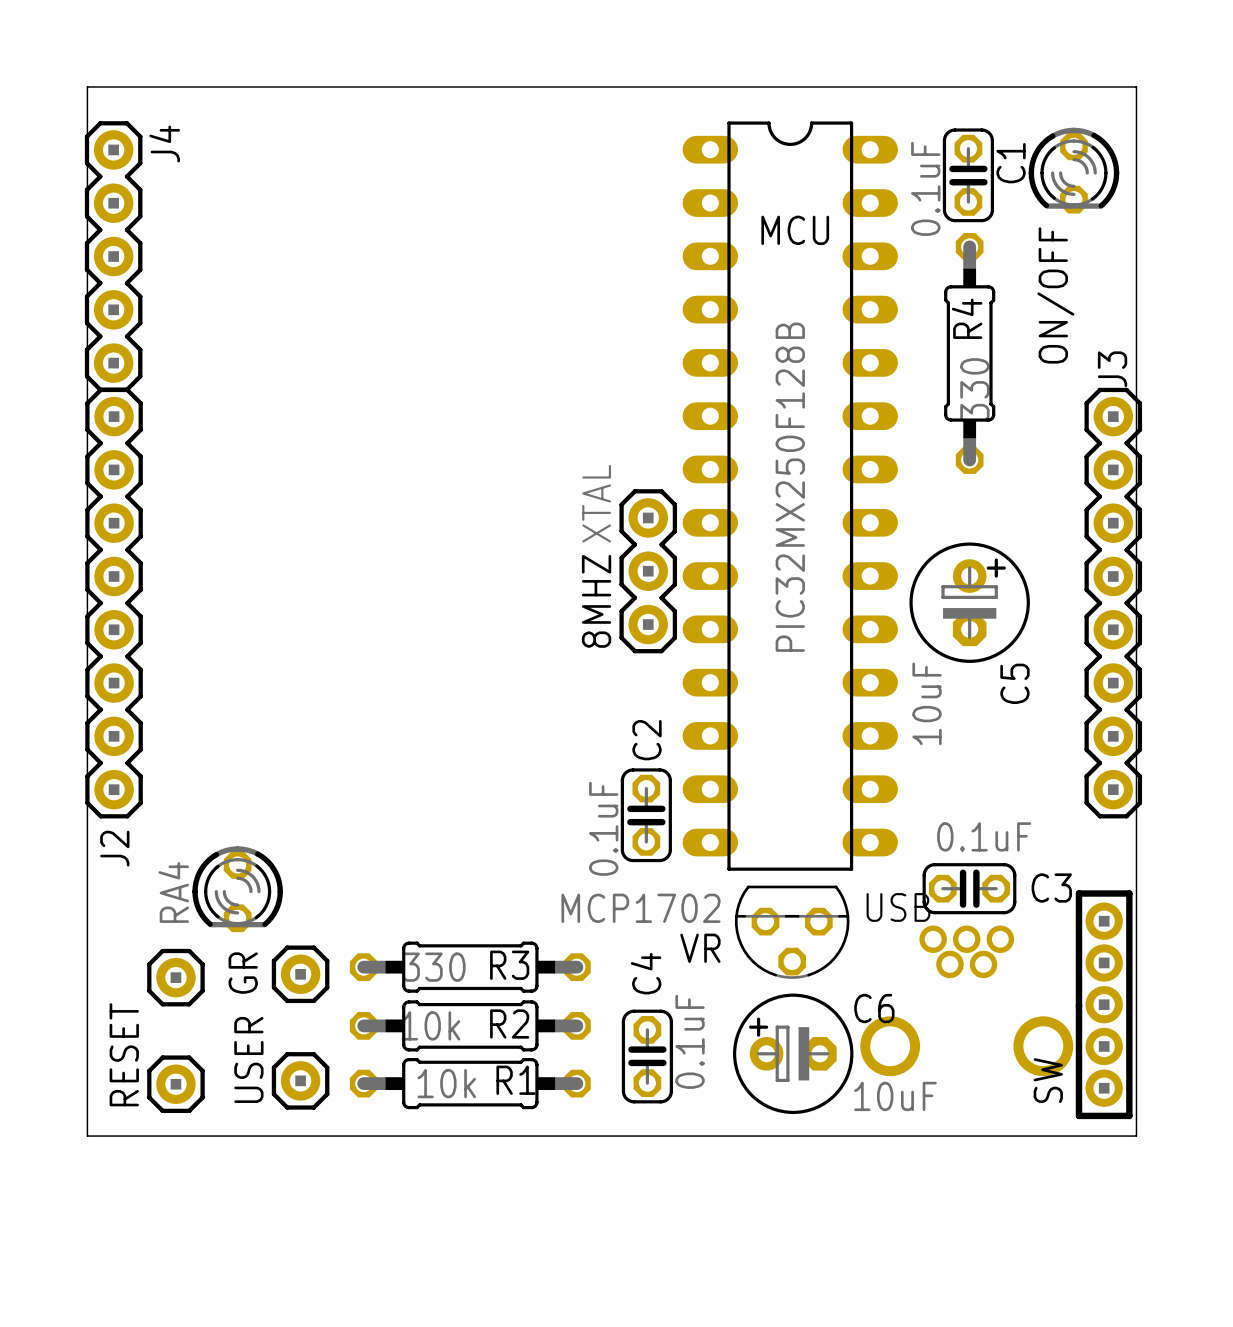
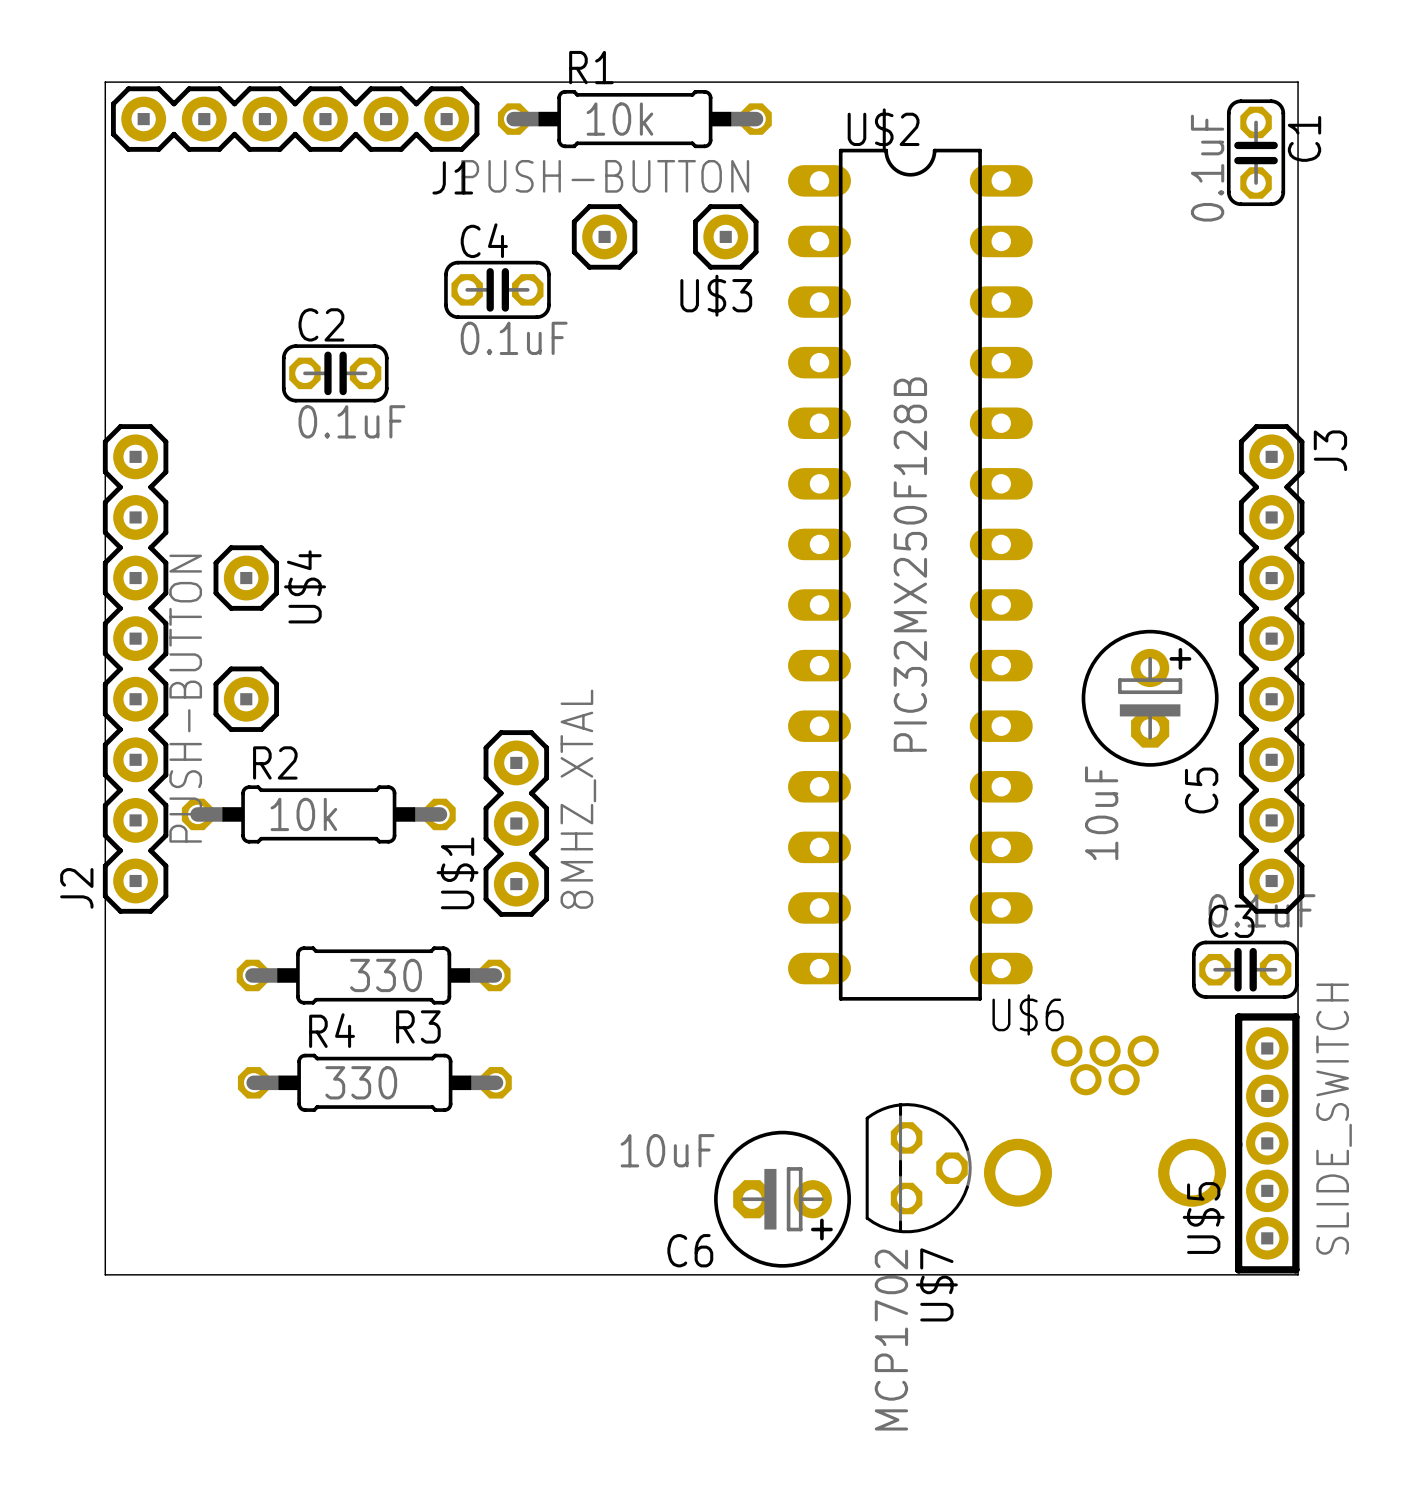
J1: none -> (295, 119)
ON/OFF: (1073, 170) -> none
C1 position: (968, 175) -> (1256, 152)
U$3: none -> PUSH-BUTTON (665, 236)
J4: (113, 256) -> none
R4 rotation: 0° (969, 353) -> 90° clockwise (374, 1082)
R4 position: (969, 353) -> (374, 1082)
J3 name position: J3 (1112, 369) -> J3 (1330, 450)
MCU: PIC32MX250F128B (790, 496) -> none
U$2: none -> PIC32MX250F128B (910, 574)
8MHZ: XTAL (648, 571) -> none
U$4: none -> PUSH-BUTTON (246, 638)
C5 position: (969, 602) -> (1150, 698)
U$1: none -> 8MHZ_XTAL (516, 823)
C2 rotation: 0° (646, 815) -> 90° counterclockwise (335, 373)
C2 position: (646, 815) -> (335, 373)
J2 name position: J2 (114, 848) -> J2 (76, 888)
C3 position: (969, 888) -> (1245, 969)
C3 name position: C3 (1051, 888) -> C3 (1231, 921)
GR: RA4 (237, 889) -> none
USB name: USB (898, 907) -> U$6 (1028, 1014)
VR: MCP1702 (792, 932) -> none
R3 name position: R3 (509, 965) -> R3 (418, 1026)
R3 value position: 330 (433, 967) -> 330 (385, 975)
R3 position: (470, 967) -> (373, 975)
C4 name position: C4 (646, 973) -> C4 (484, 240)
SW value: none -> SLIDE_SWITCH (1334, 1119)
SW position: (1104, 1004) -> (1267, 1143)
R2 name position: R2 (509, 1023) -> R2 (275, 762)
R2 value position: 10k (431, 1025) -> 10k (303, 814)
R2 position: (470, 1025) -> (318, 814)
USER: (300, 1027) -> none
RESET: (175, 1030) -> none
U$7: none -> MCP1702 (918, 1168)
C6 rotation: 0° (793, 1053) -> 180° (782, 1199)
C6 position: (793, 1053) -> (782, 1199)
C4 rotation: 0° (647, 1056) -> 90° clockwise (497, 289)
C4 position: (647, 1056) -> (497, 289)
R1 name position: R1 (516, 1080) -> R1 (591, 67)
SW name: SW (1048, 1080) -> U$5 (1203, 1218)
R1 value position: 10k (446, 1083) -> 10k (619, 119)
R1 position: (470, 1083) -> (634, 119)

